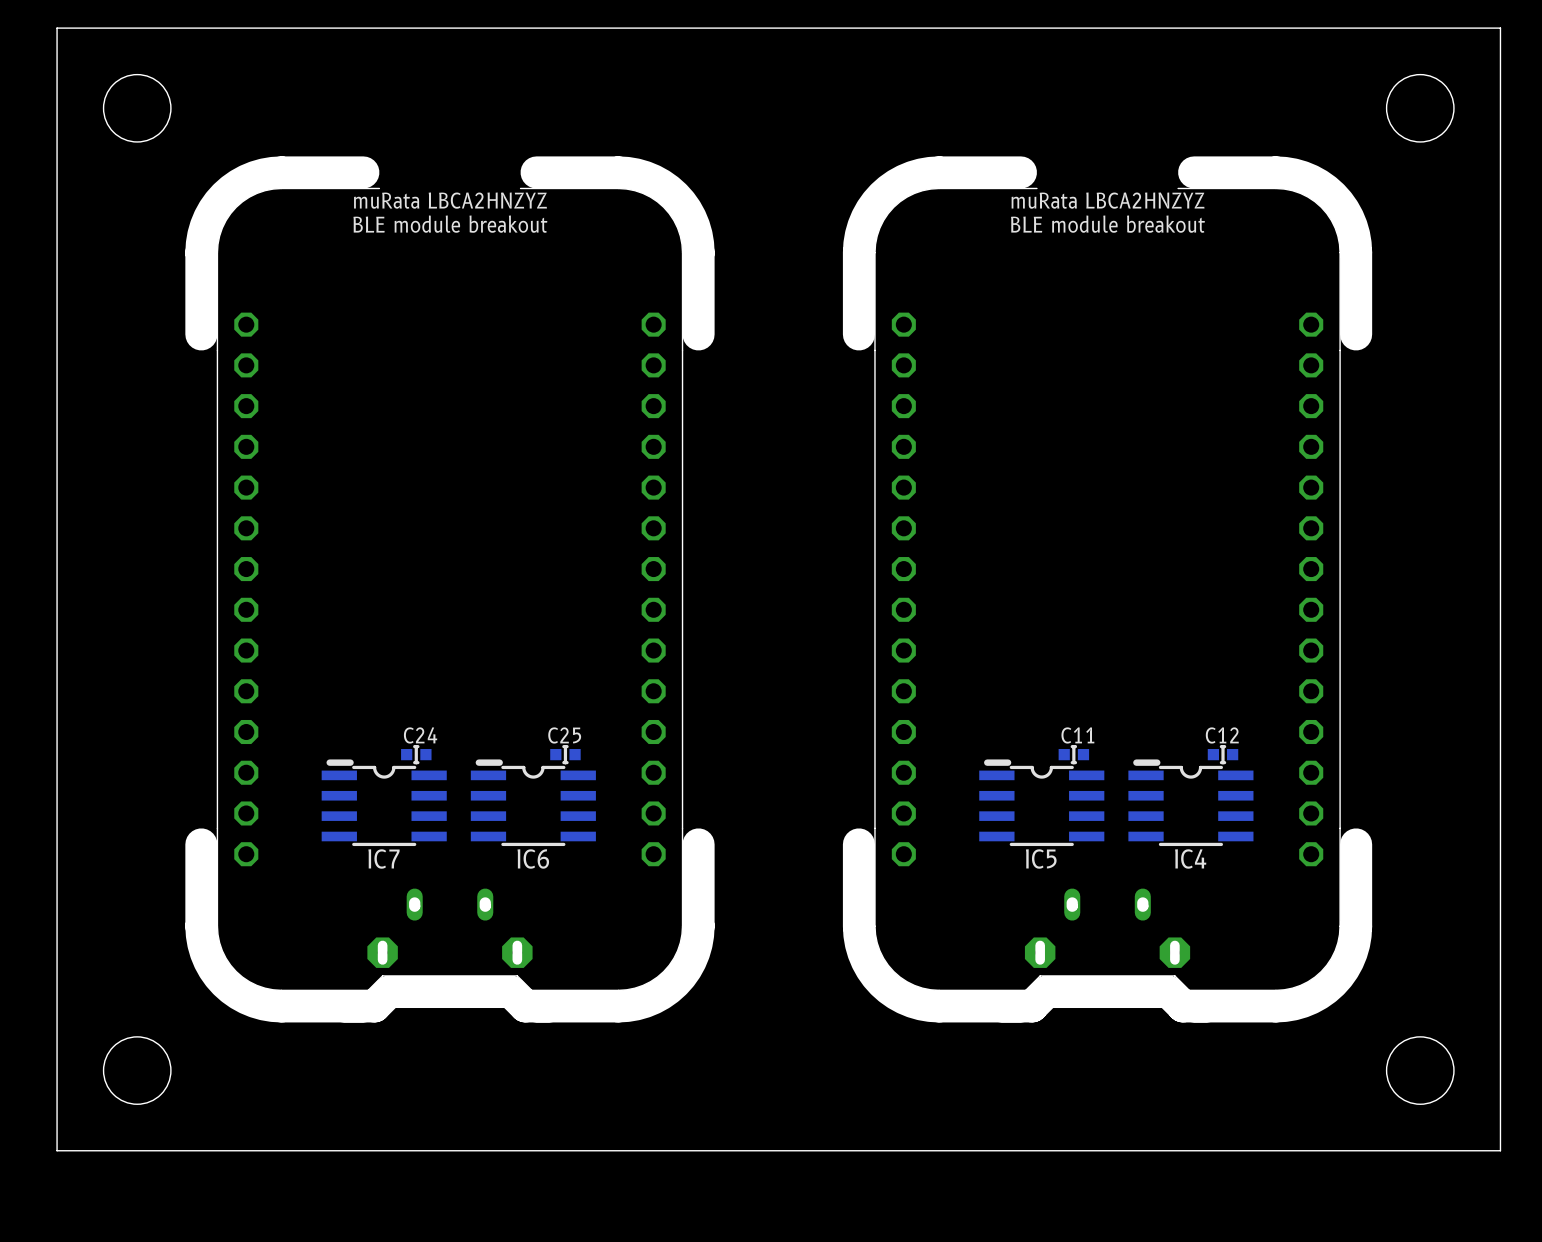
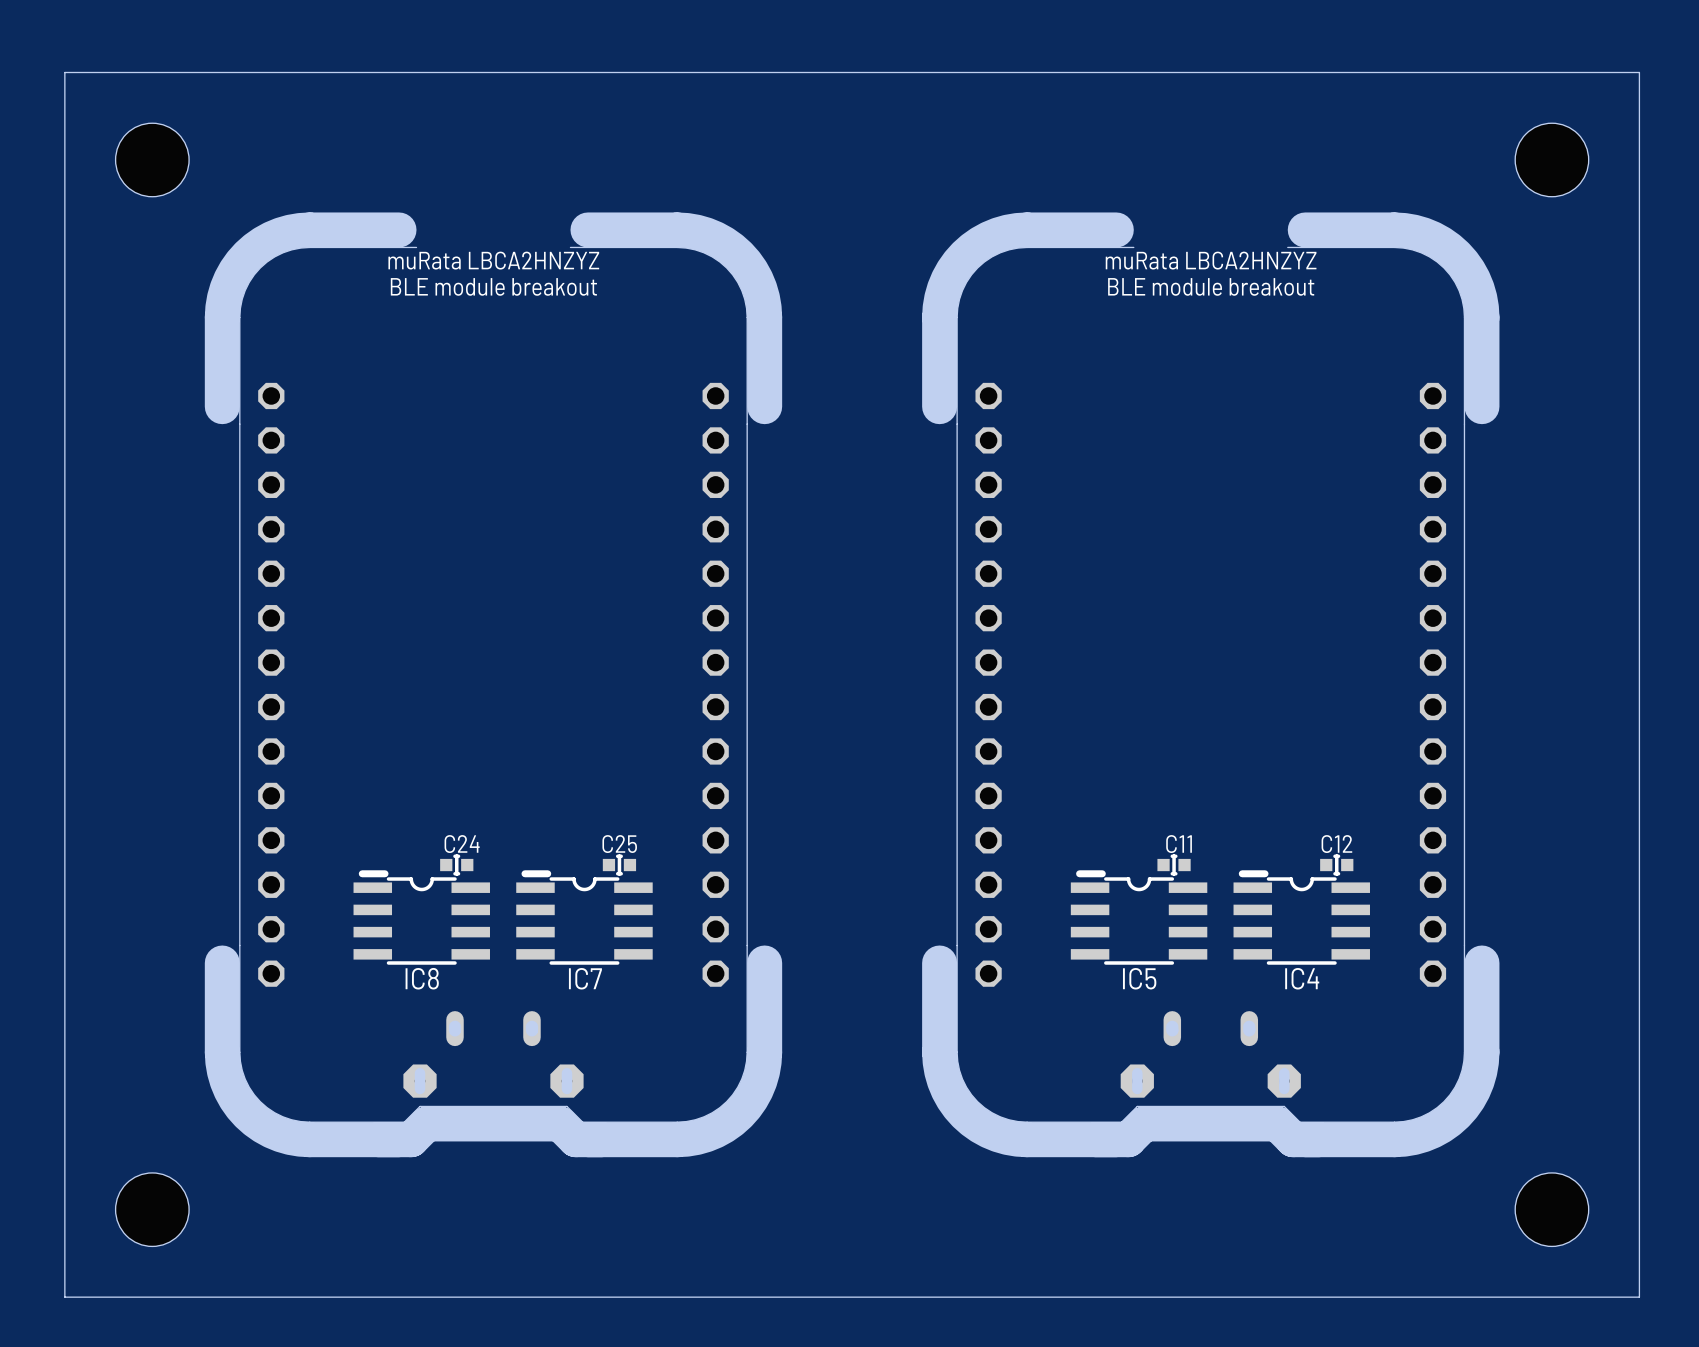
IC7 name: IC7 (383, 858) -> IC8 (422, 978)
IC6 name: IC6 (533, 858) -> IC7 (585, 978)

